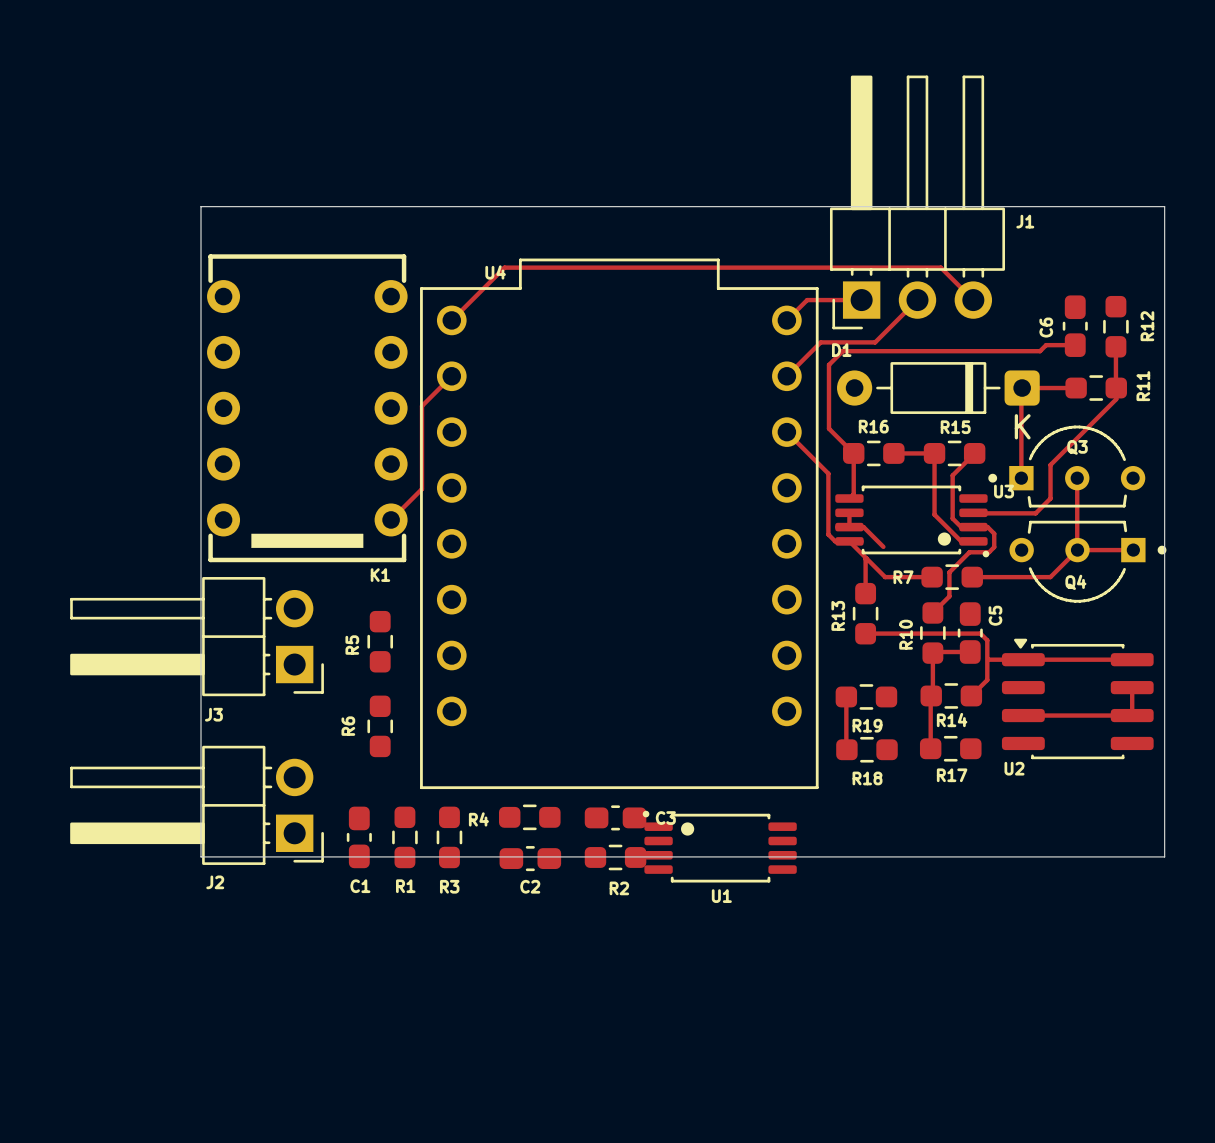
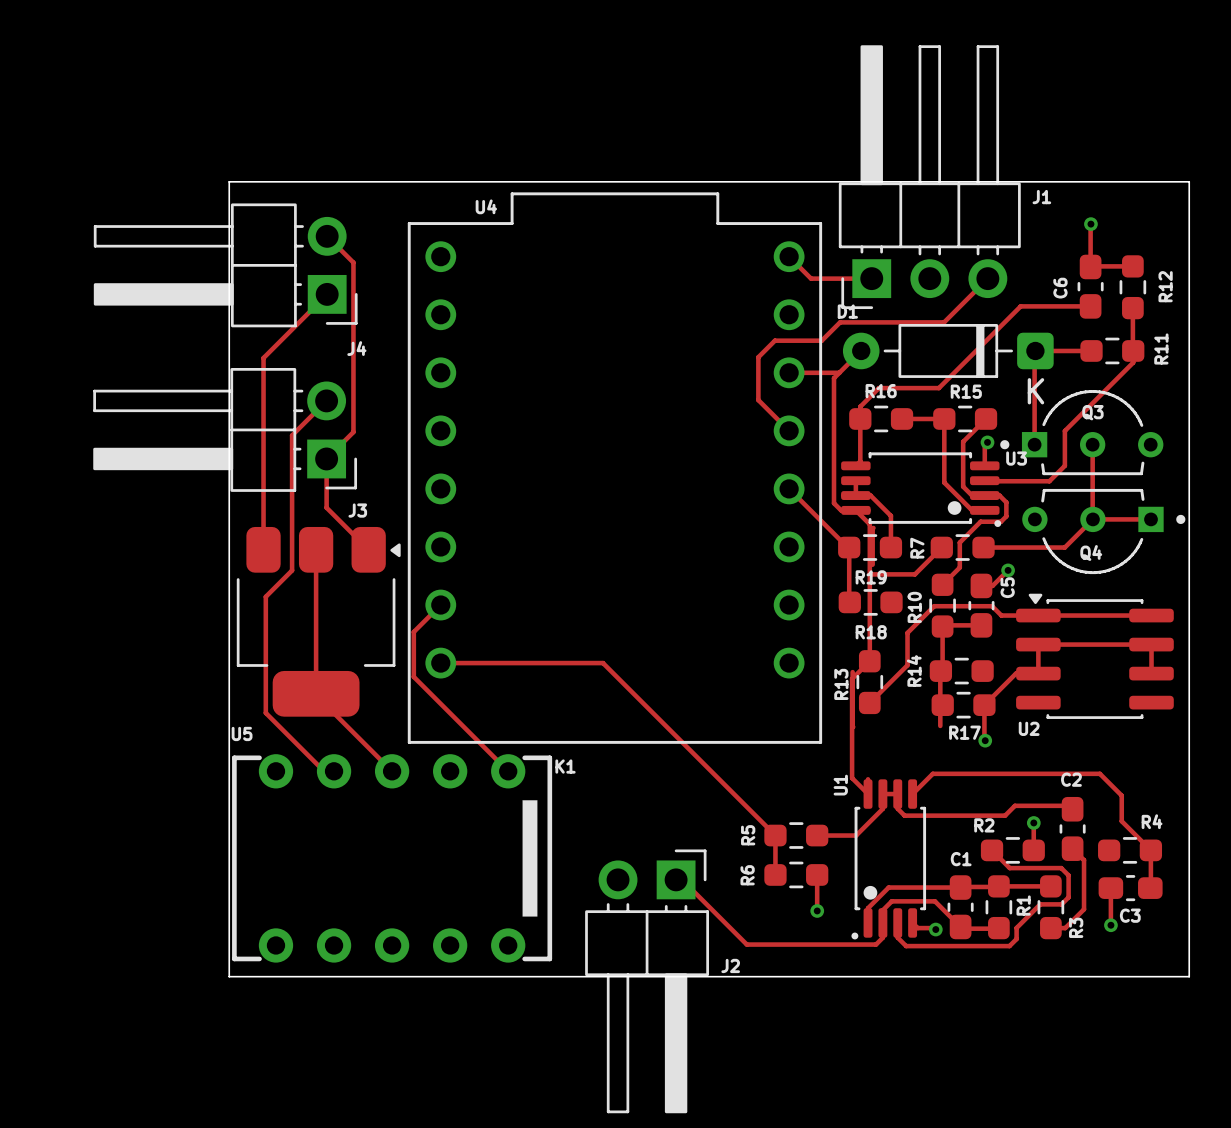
J1 position: (917, 202) -> (929, 177)
board edge: (201, 206) (1164, 206) (1164, 856) (201, 856) (201, 206) -> (229, 181) (229, 976) (1189, 976) (1189, 181) (229, 181)
track: none -> (1090, 224) (1090, 266) (1132, 266)
via: none -> (1090, 224)
track: none -> (327, 236) (353, 262) (353, 432) (326, 458) (326, 507) (368, 549)
track: none -> (789, 256) (811, 278) (871, 278) (869, 280)
track: (861, 300) (807, 300) (786, 320) -> none
track: (917, 300) (875, 342) (820, 342) (786, 376) -> none
track: (973, 300) (940, 267) (504, 267) (451, 320) -> none
J4: none -> (225, 265)
track: none -> (987, 278) (944, 322) (840, 322) (821, 340) (774, 340) (758, 357) (758, 400) (789, 430)
track: none -> (327, 294) (263, 358) (263, 549)
track: (1046, 345) (1040, 351) (842, 351) (828, 364) (828, 428) (853, 453) -> (1060, 306) (1020, 306) (938, 388) (878, 388) (860, 406) (860, 418)
track: (451, 376) (421, 406) (421, 489) (391, 519) -> none
K1 rotation: 0° (307, 408) -> 90° counterclockwise (392, 858)
K1 position: (307, 408) -> (392, 858)
track: none -> (789, 372) (839, 372)
track: (786, 432) (828, 473) -> (861, 350) (834, 378) (834, 439)
track: none -> (326, 400) (292, 435) (292, 570) (265, 596) (265, 712) (324, 771) (334, 771)
track: none -> (987, 442) (984, 445) (984, 465)
via: none -> (987, 442)
track: none -> (789, 488) (849, 547) (849, 602)
U4 position: (619, 523) -> (614, 468)
track: none -> (890, 515) (890, 547)
track: (862, 554) (885, 577) (932, 577) -> (869, 574) (914, 574) (941, 547)
track: none -> (869, 524) (869, 665)
R7 name rotation: 0° (903, 577) -> 90° counterclockwise (917, 548)
track: none -> (316, 549) (316, 695) (392, 771)
track: none -> (1008, 570) (992, 585) (981, 585)
via: none -> (1008, 570)
R13 position: (865, 613) -> (869, 682)
track: none -> (440, 605) (413, 631) (413, 676) (508, 771)
track: (865, 633) (924, 633) -> (869, 702) (907, 665) (907, 632) (934, 606)
J3 position: (197, 636) -> (225, 429)
track: (987, 640) (987, 680) (971, 695) -> (999, 613) (1001, 615) (1151, 615)
R5 rotation: 0° (380, 641) -> 90° clockwise (796, 835)
R5 position: (380, 641) -> (796, 835)
U5: none -> (318, 621)
track: (989, 659) (1132, 659) -> none
track: none -> (869, 661) (852, 678) (852, 778) (868, 794) (868, 779)
track: (1132, 687) (1132, 715) (1023, 715) -> none
track: none -> (440, 663) (603, 663) (775, 835) (775, 874)
R19 position: (866, 696) -> (870, 547)
U2 position: (1077, 698) -> (1094, 656)
track: none -> (1151, 673) (1151, 644) (1038, 644) (1038, 673) (1015, 673) (984, 705) (985, 740)
J3 name position: J3 (213, 714) -> J3 (357, 510)
R14 name rotation: 0° (952, 720) -> 90° counterclockwise (914, 670)
R14 name position: R14 (952, 720) -> R14 (914, 670)
R6 rotation: 0° (380, 726) -> 90° clockwise (796, 874)
R6 position: (380, 726) -> (796, 874)
R17 position: (950, 748) -> (963, 705)
R18 position: (866, 749) -> (870, 602)
via: none -> (985, 740)
J2 rotation: 0° (197, 805) -> 90° counterclockwise (647, 981)
J2 position: (197, 805) -> (647, 981)
track: none -> (912, 794) (932, 773) (1099, 773) (1121, 795) (1121, 821) (1150, 850) (1150, 888)
R4 position: (529, 817) -> (1130, 850)
C3 position: (615, 817) -> (1130, 888)
C3 name position: C3 (665, 818) -> C3 (1130, 915)
R4 name position: R4 (478, 819) -> R4 (1152, 821)
track: none -> (1072, 809) (1069, 805) (1014, 805) (1005, 815) (904, 815) (897, 808) (897, 794) (882, 794) (882, 808) (856, 835) (817, 835)
C1 position: (359, 837) -> (960, 907)
R1 position: (404, 837) -> (998, 907)
R3 position: (449, 837) -> (1050, 907)
via: none -> (1033, 822)
U1 rotation: 0° (719, 846) -> 90° counterclockwise (888, 859)
U1 position: (719, 846) -> (888, 859)
R2 position: (615, 857) -> (1012, 850)
C2 rotation: 0° (530, 858) -> 90° clockwise (1072, 828)
C2 position: (530, 858) -> (1072, 828)
track: none -> (1072, 848) (1084, 860) (1084, 909) (1065, 928) (1050, 928)
track: none -> (992, 850) (1009, 868) (1061, 868) (1068, 875) (1068, 897) (1061, 904) (1040, 904) (1016, 928) (1016, 939) (1009, 946) (906, 946) (897, 937) (897, 922)
C1 name position: C1 (360, 886) -> C1 (961, 859)
R1 name rotation: 0° (405, 886) -> 90° counterclockwise (1023, 905)
R1 name position: R1 (405, 886) -> R1 (1023, 905)
R3 name rotation: 0° (449, 886) -> 90° counterclockwise (1076, 927)
R3 name position: R3 (449, 886) -> R3 (1076, 927)
C2 name position: C2 (530, 886) -> C2 (1071, 779)
R2 name position: R2 (619, 888) -> R2 (984, 825)
track: none -> (817, 874) (817, 910)
track: none -> (676, 879) (682, 879) (746, 944) (876, 944) (882, 937) (882, 910) (891, 901) (935, 901) (962, 928) (998, 928)
U1 name position: U1 (721, 896) -> U1 (840, 785)
track: none -> (998, 886) (1050, 886)
track: none -> (999, 887) (888, 887) (868, 908) (868, 922) (866, 924)
track: none -> (1110, 888) (1110, 925)
via: none -> (817, 910)
track: none -> (912, 922) (917, 928) (935, 929)
via: none -> (1110, 925)
via: none -> (935, 929)

